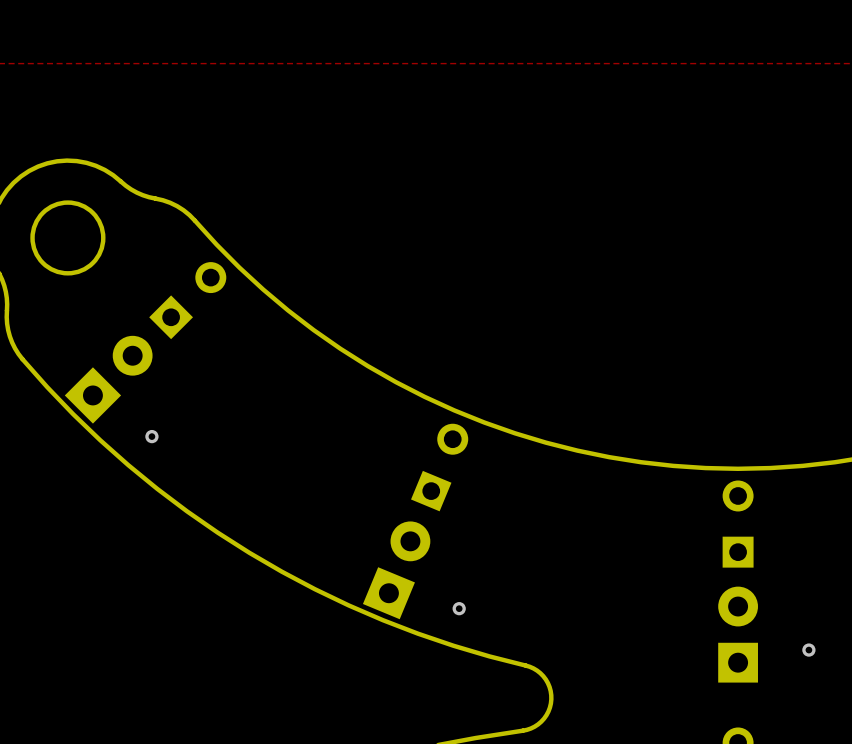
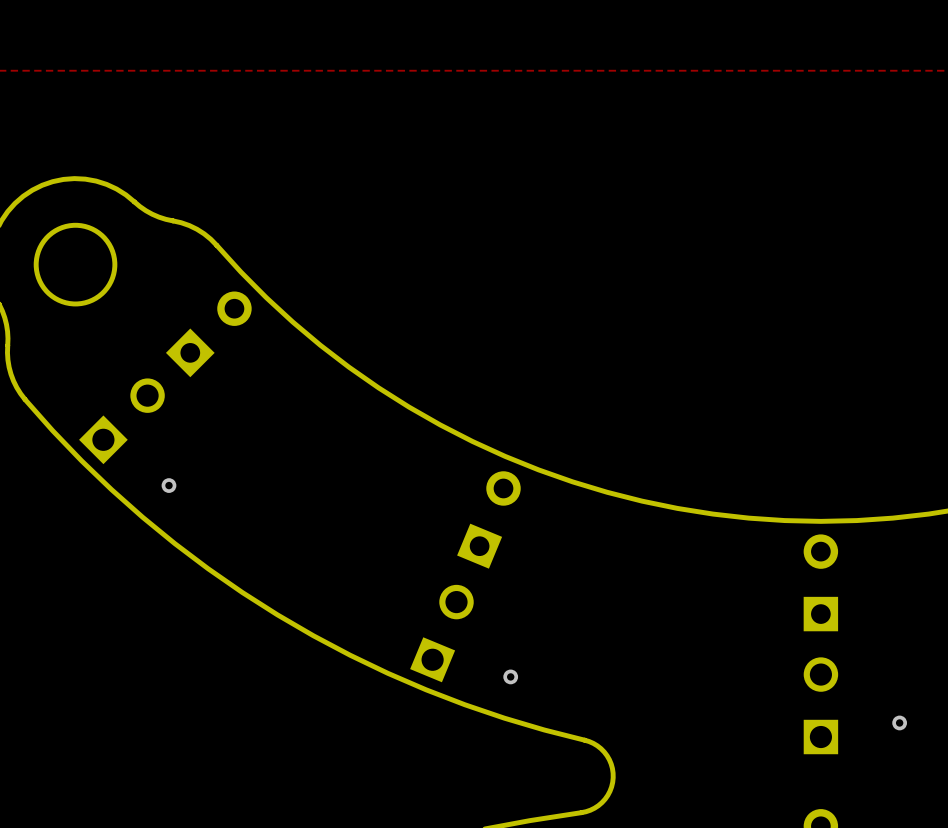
part footprint: [64, 335, 153, 424] -> [79, 378, 165, 465]
part footprint: [362, 521, 431, 620] -> [410, 584, 474, 683]
part footprint: [718, 586, 758, 683] -> [803, 657, 839, 755]

